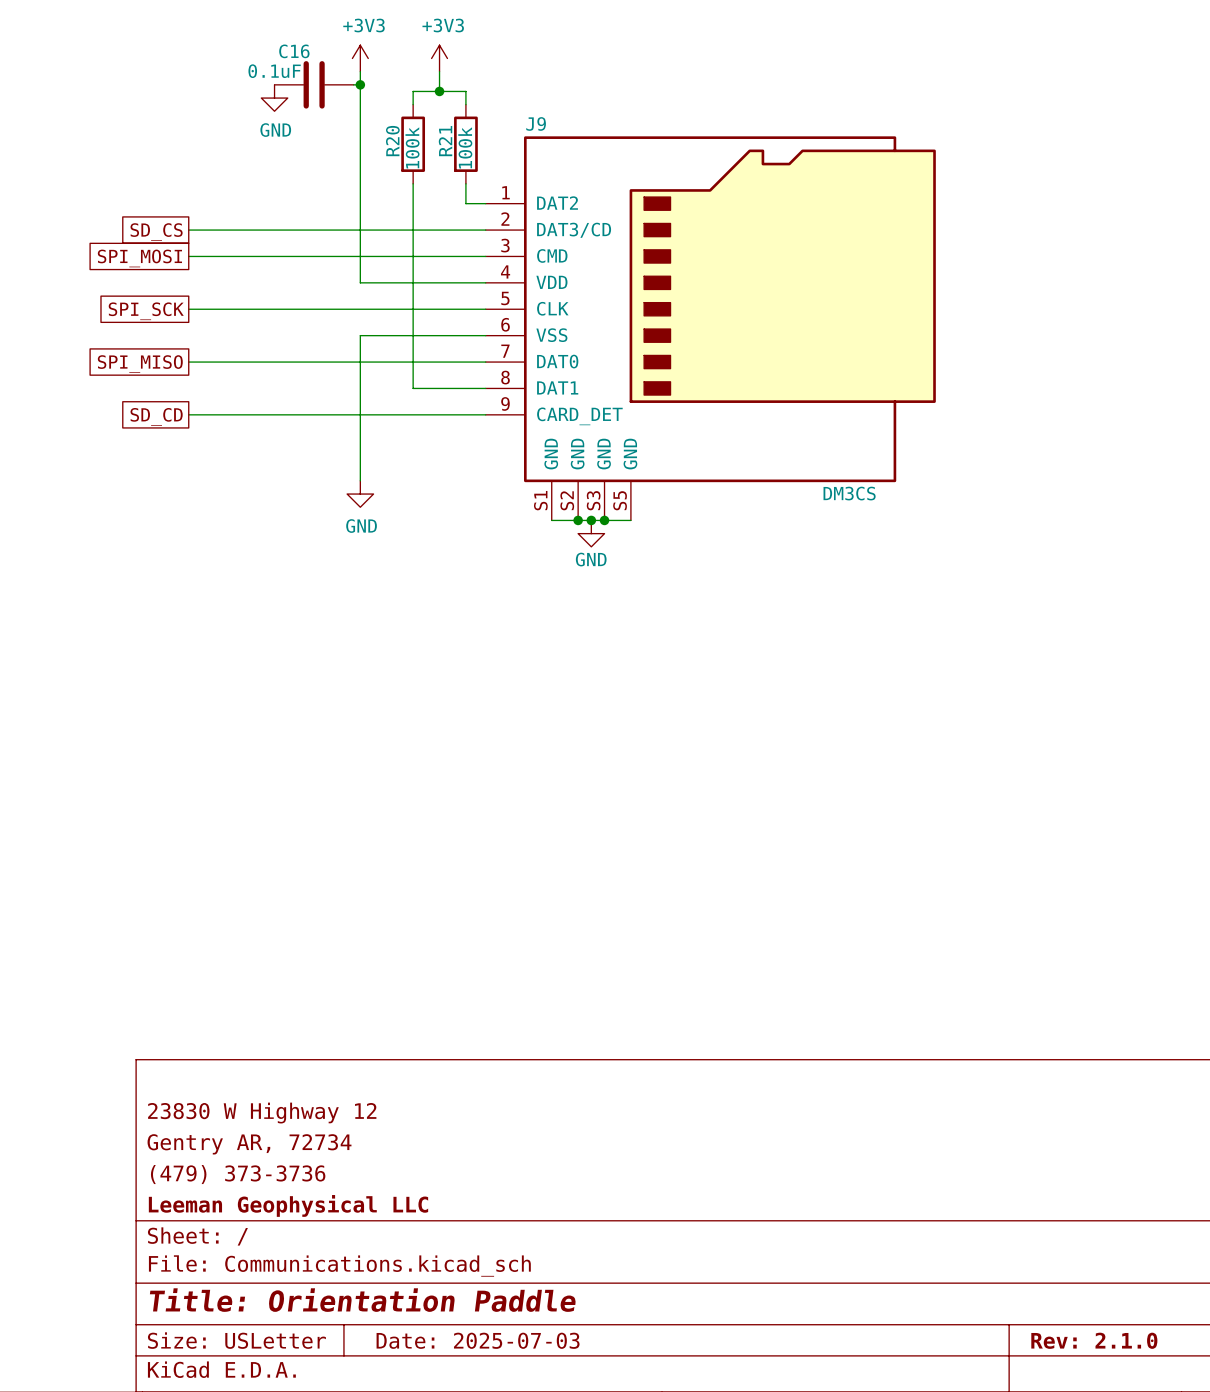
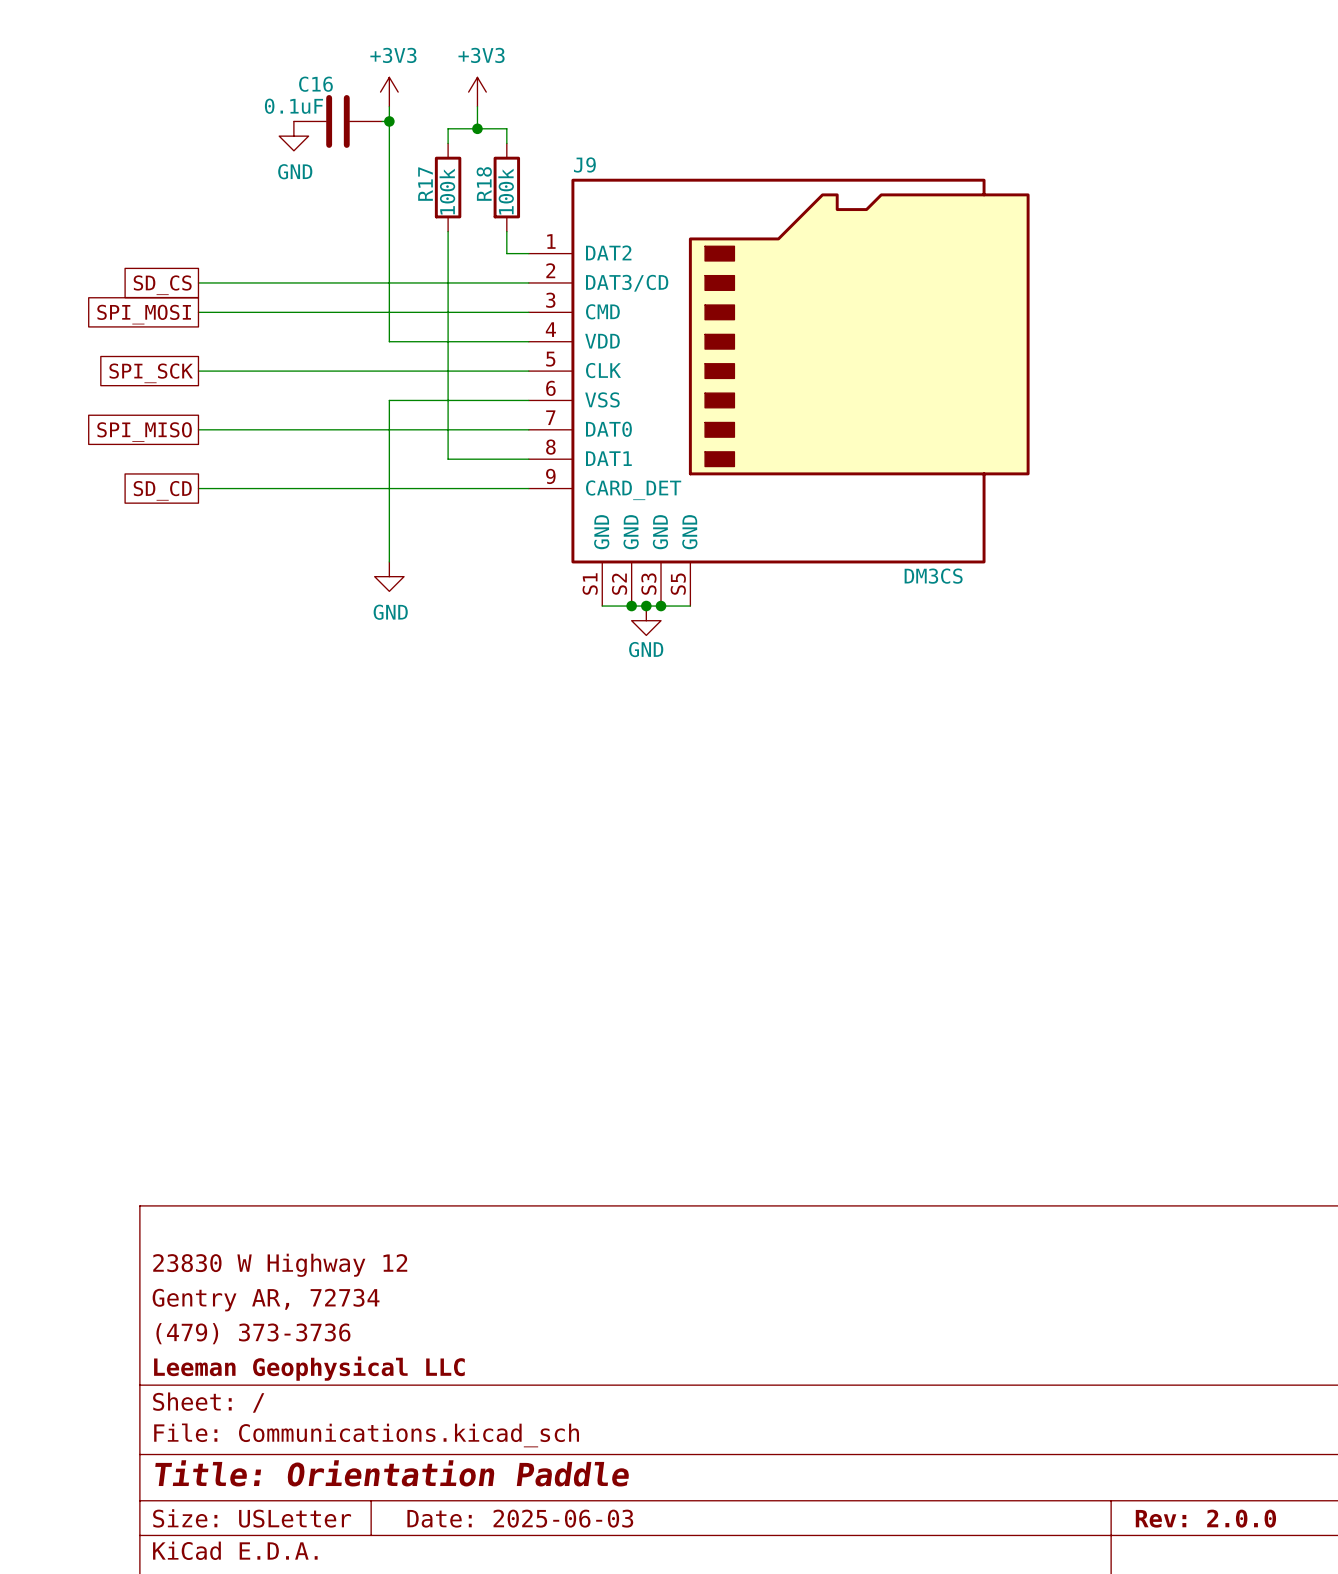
R20 name: R20 (392, 141) -> R17 (425, 184)
R21 name: R21 (445, 141) -> R18 (484, 183)
title block: Date: 2025-07-03 (478, 1340) -> Date: 2025-06-03 (520, 1518)
title block: Rev: 2.1.0 (1094, 1340) -> Rev: 2.0.0 (1205, 1518)

